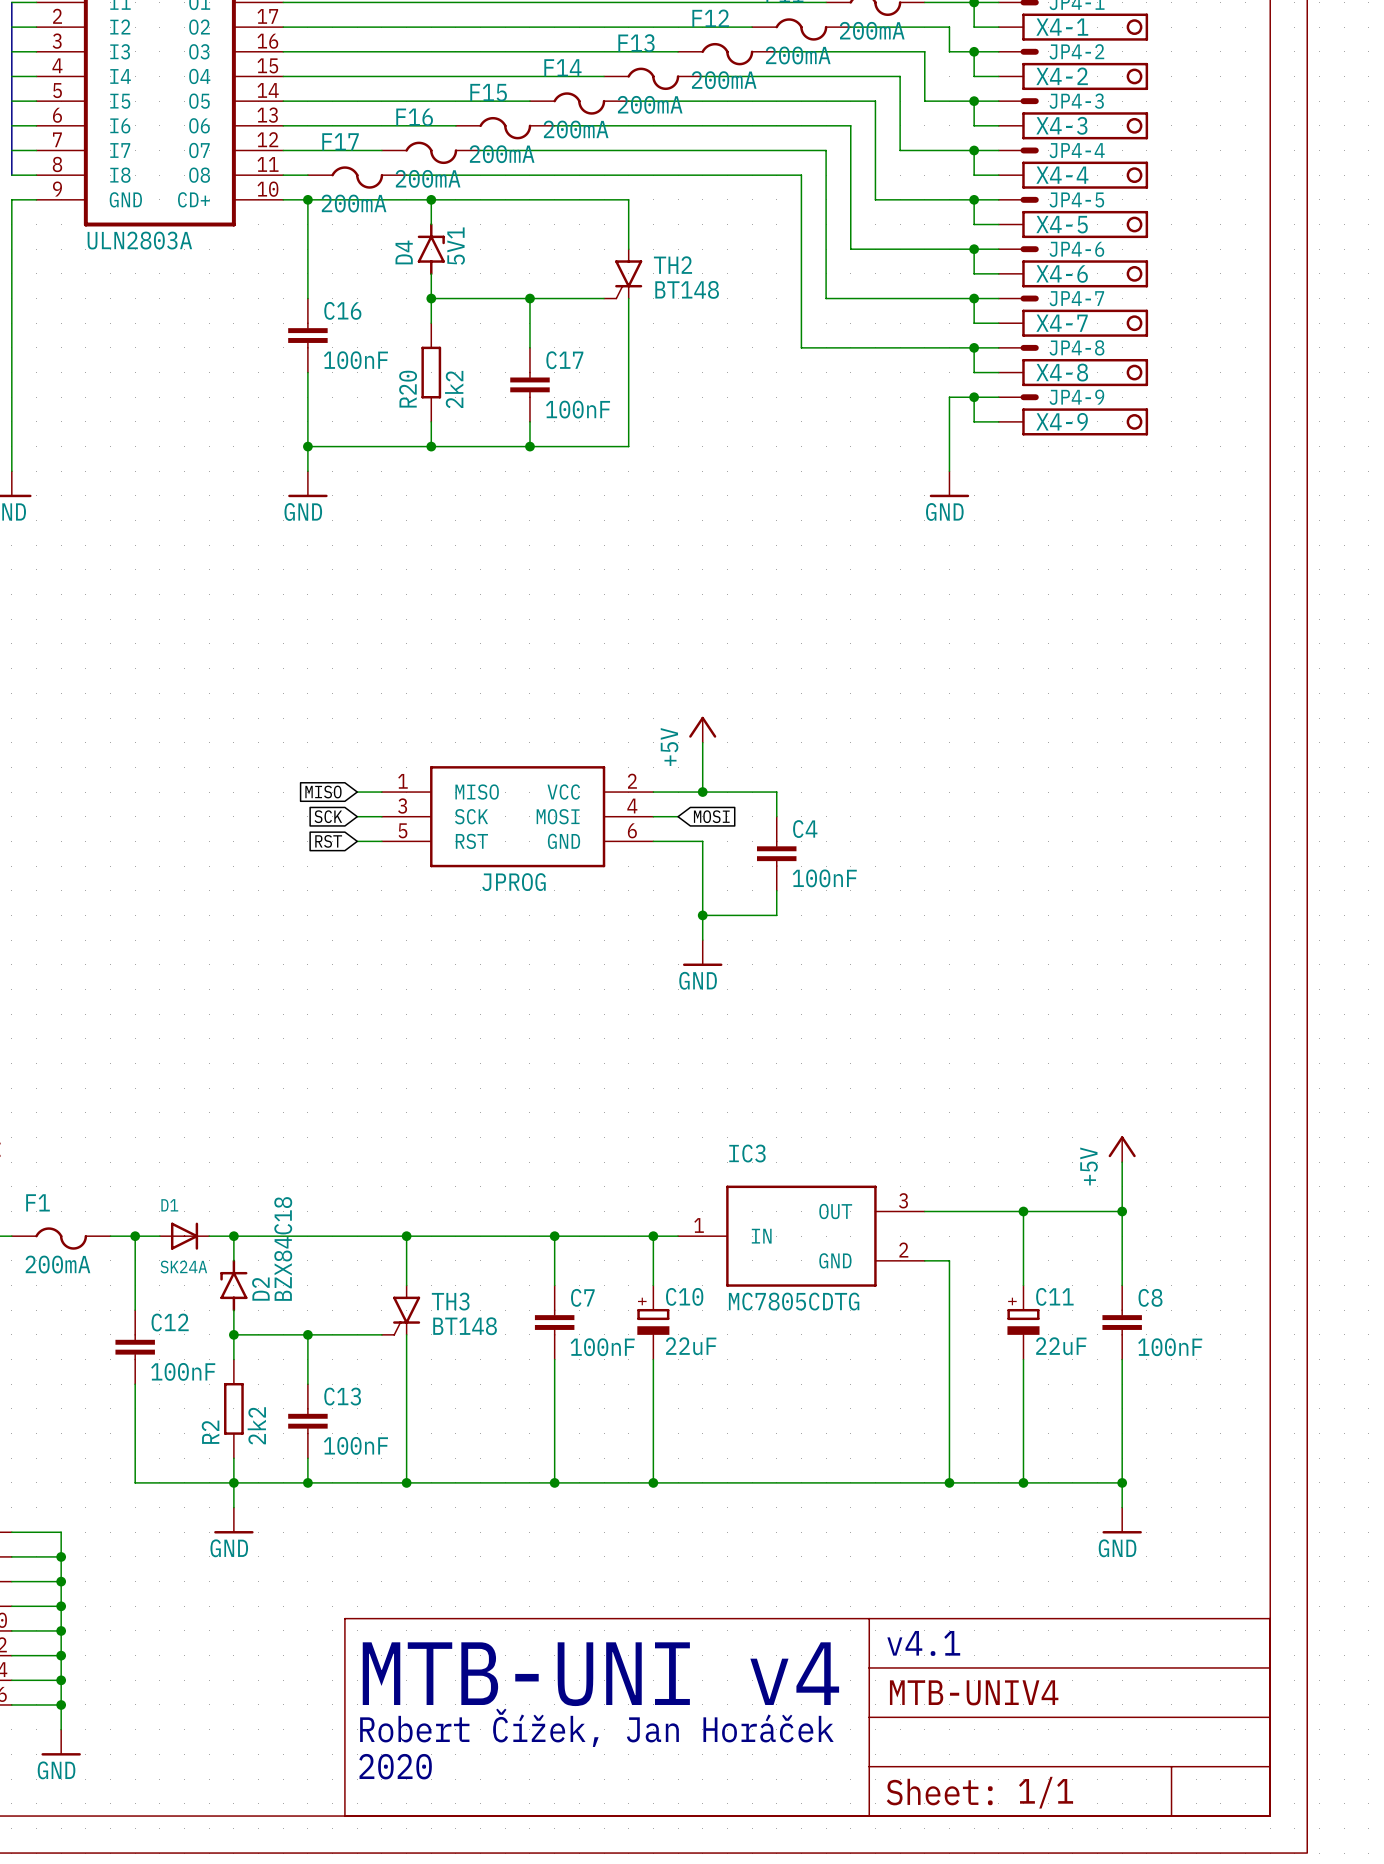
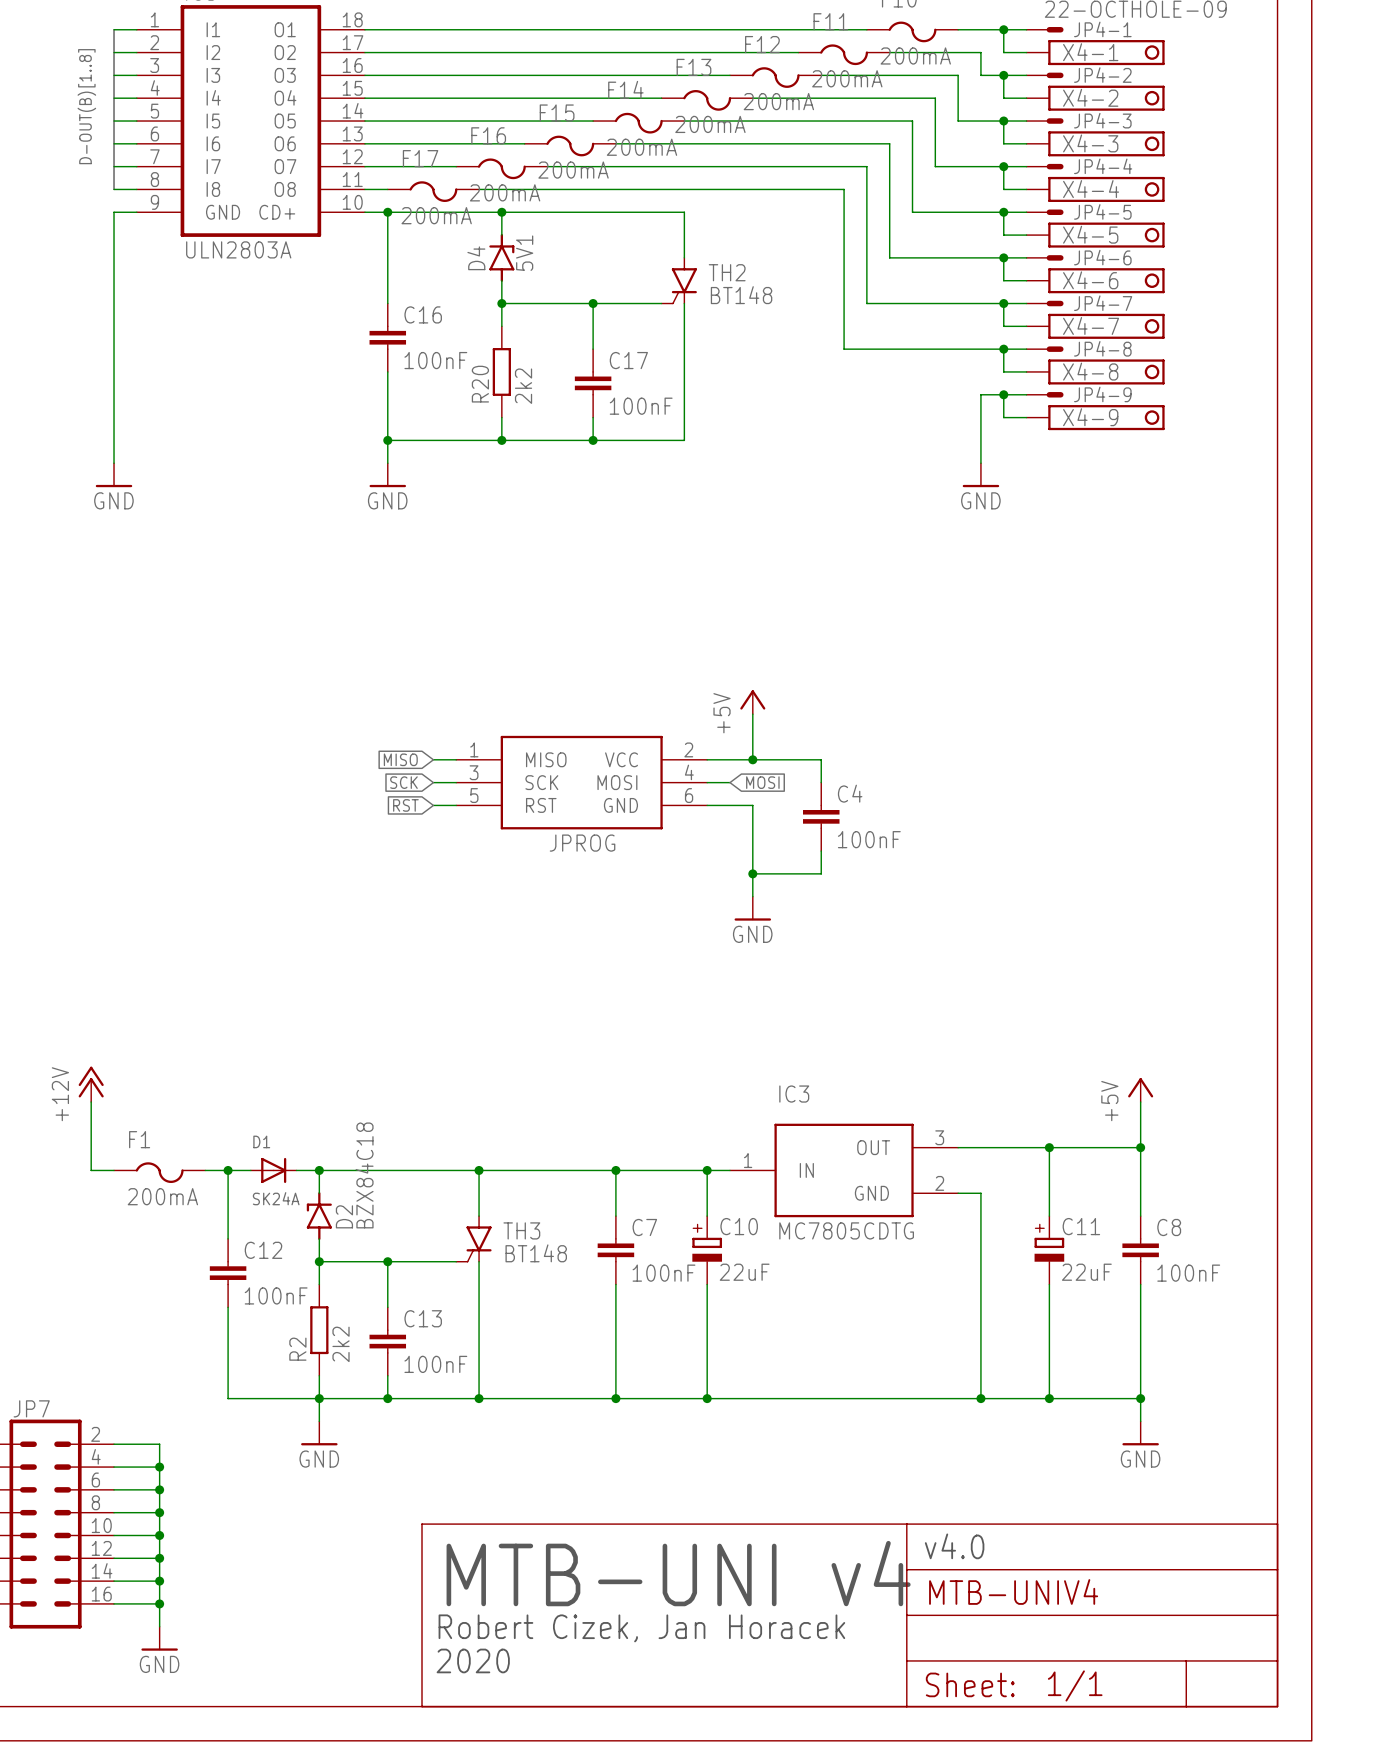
text: v4.1 (923, 1643) -> v4.0 (954, 1546)
text: Robert Čížek, Jan Horáček (596, 1727) -> Robert Cizek, Jan Horacek (641, 1628)

